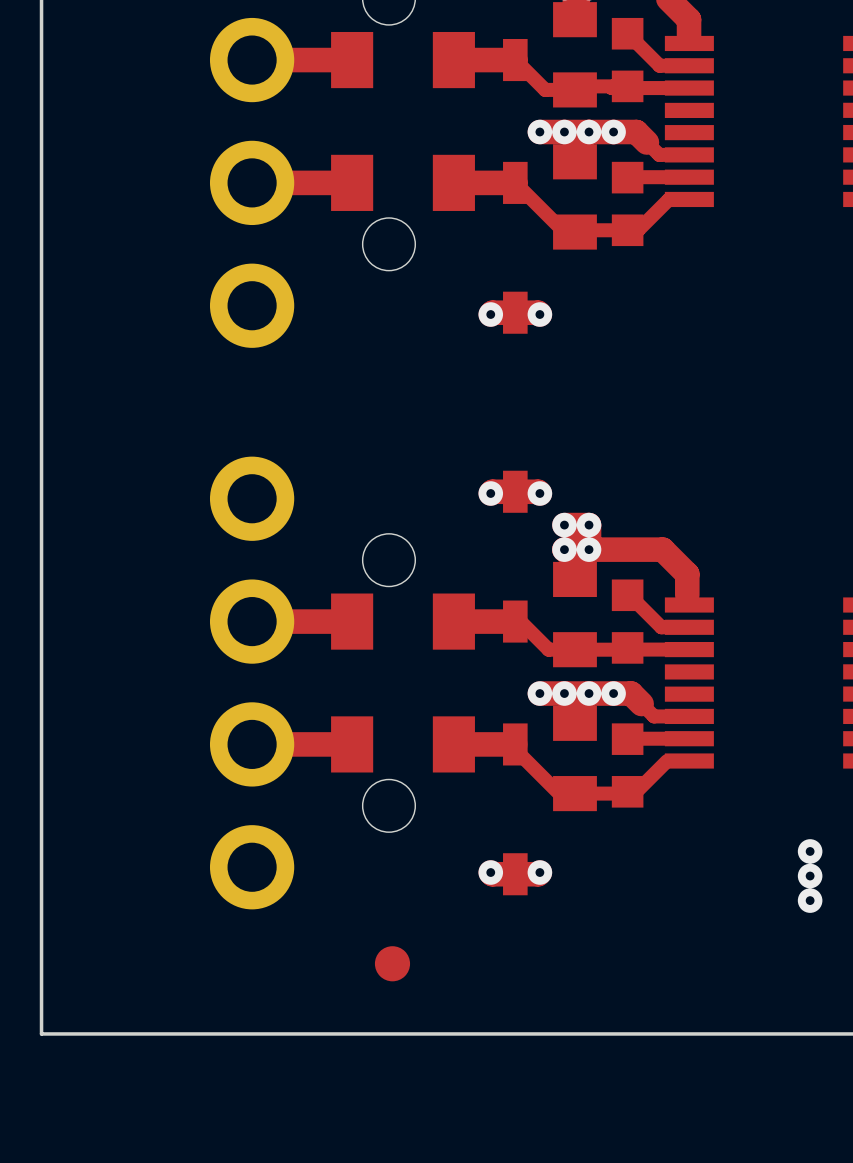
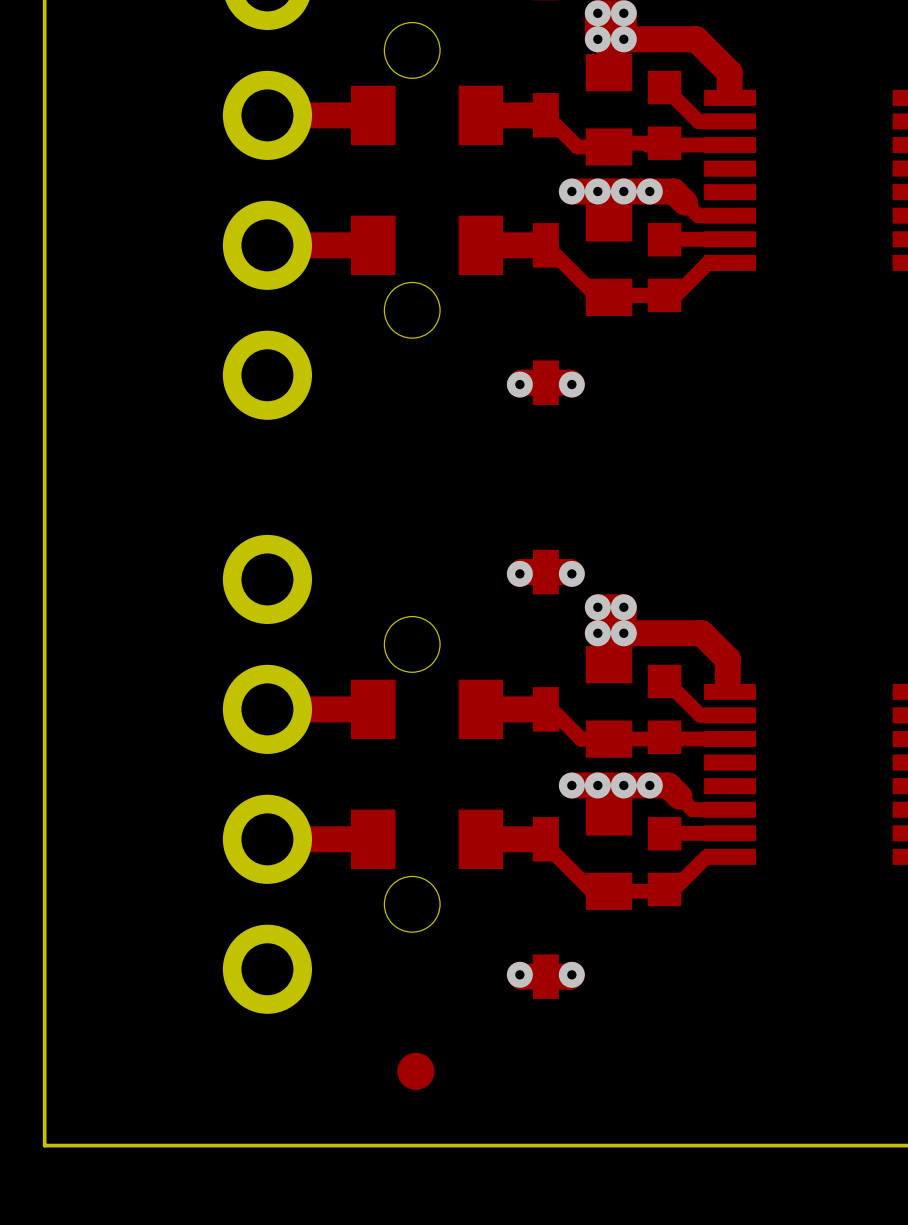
via: (810, 851) -> none
via: (810, 876) -> none
via: (810, 900) -> none

